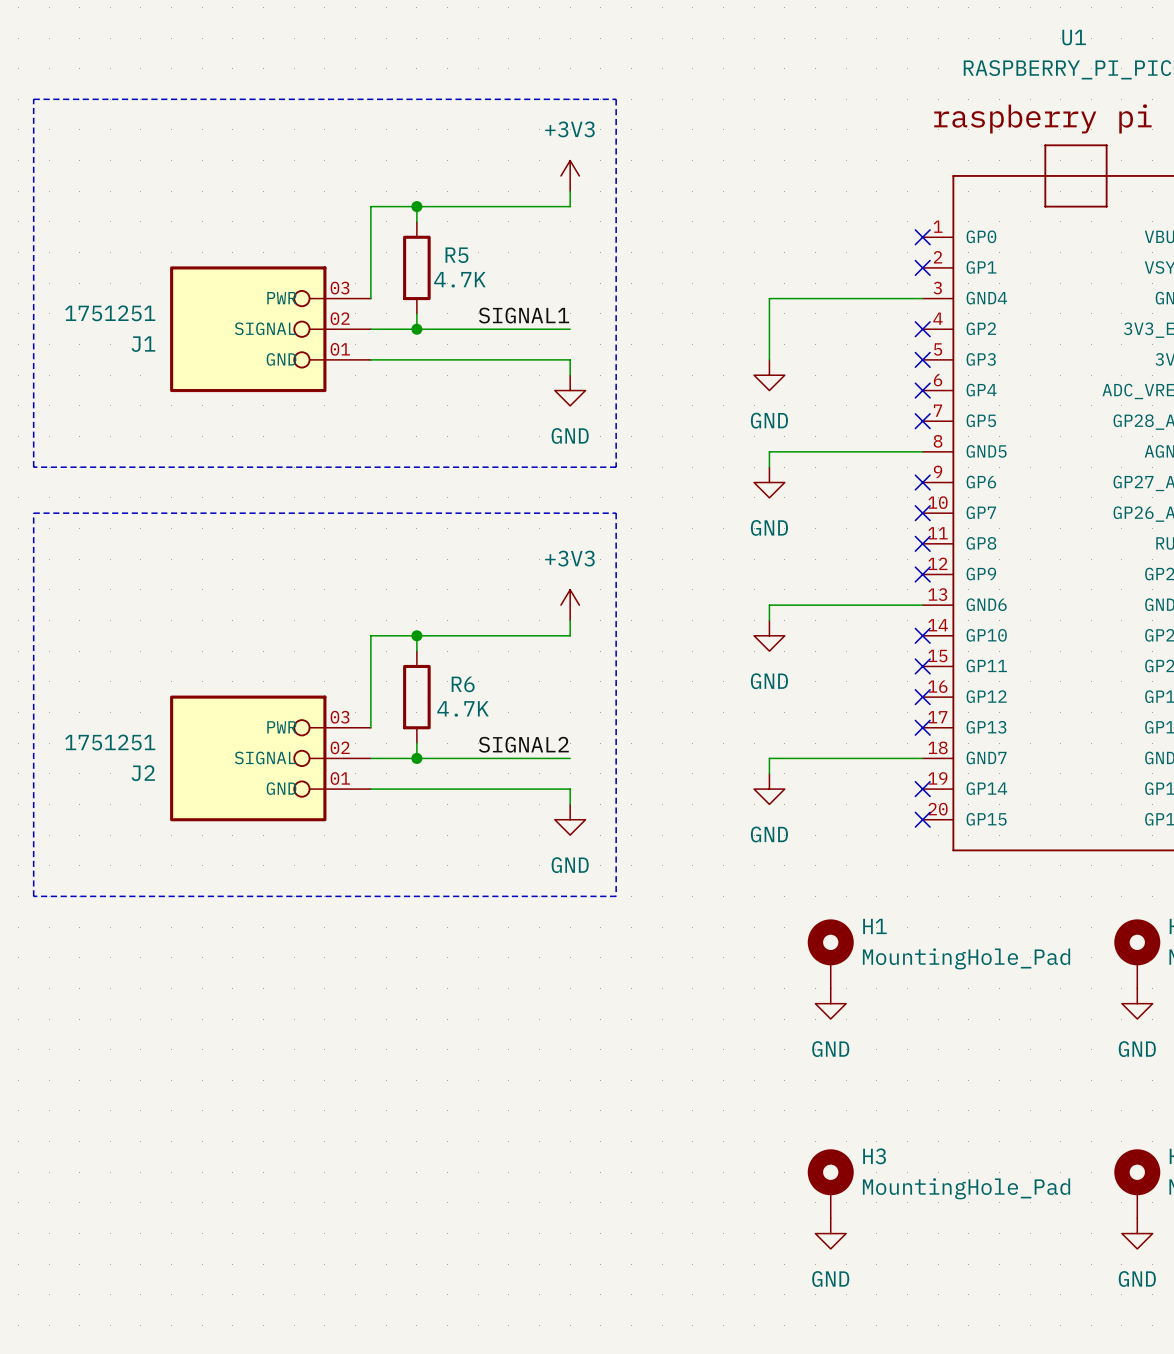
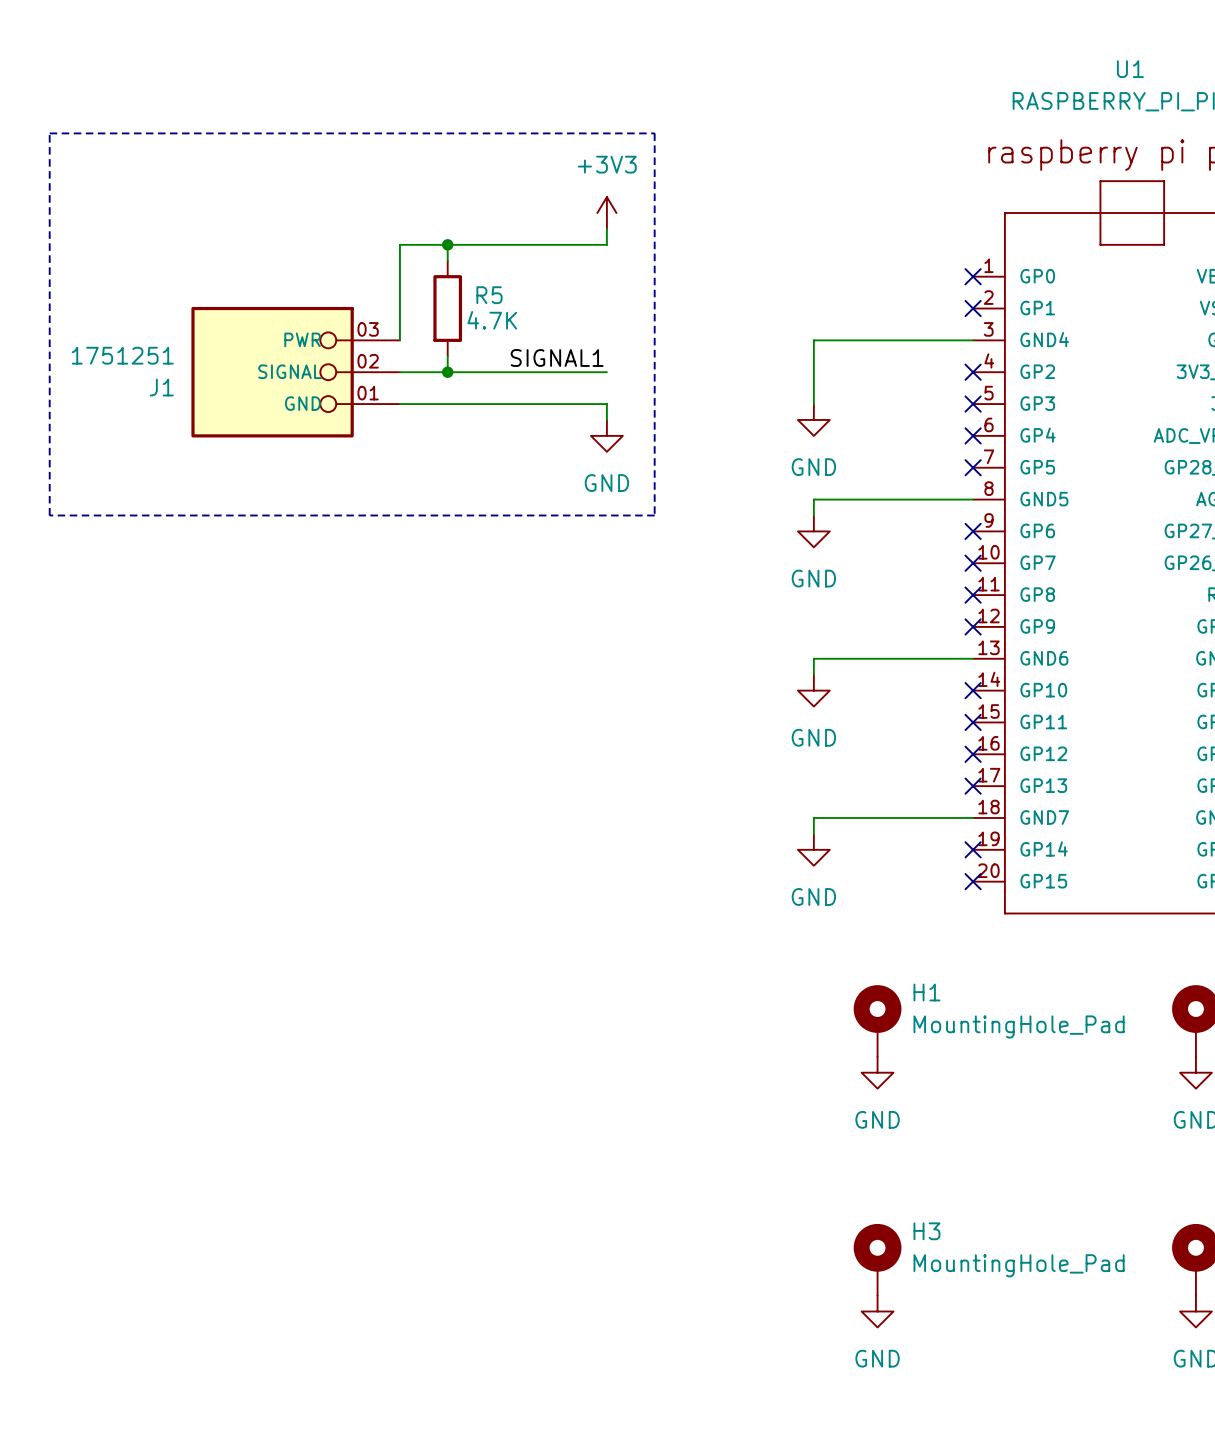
line: (33, 513) (616, 513) (616, 896) (33, 896) (33, 513) -> none
power symbol: +3V3 (570, 605) -> none
wire: (570, 620) (570, 635) (370, 635) (370, 727) -> none
wire: (416, 635) (416, 651) -> none
junction: (416, 635) -> none
R6: 4.7K (416, 697) -> none
wire: (416, 743) (416, 758) -> none
label: SIGNAL2 (523, 744) -> none
J2: 1751251 (270, 758) -> none
wire: (370, 758) (570, 758) -> none
junction: (416, 758) -> none
wire: (370, 789) (570, 789) (570, 804) -> none
power symbol: GND (570, 819) -> none

